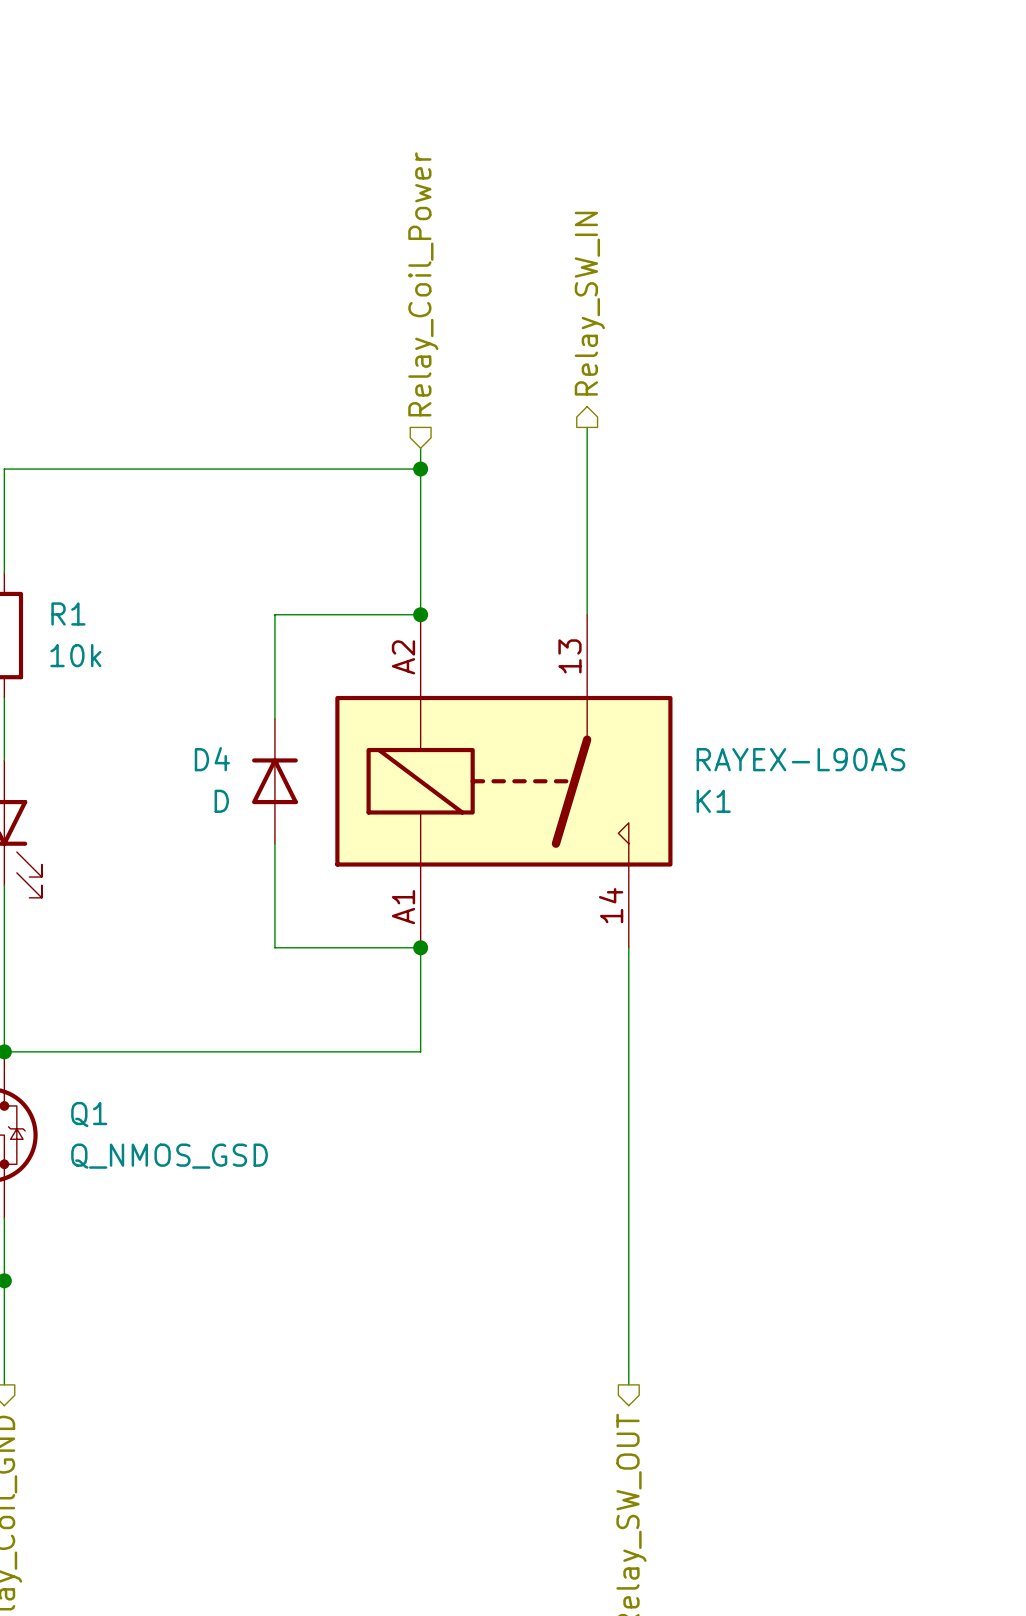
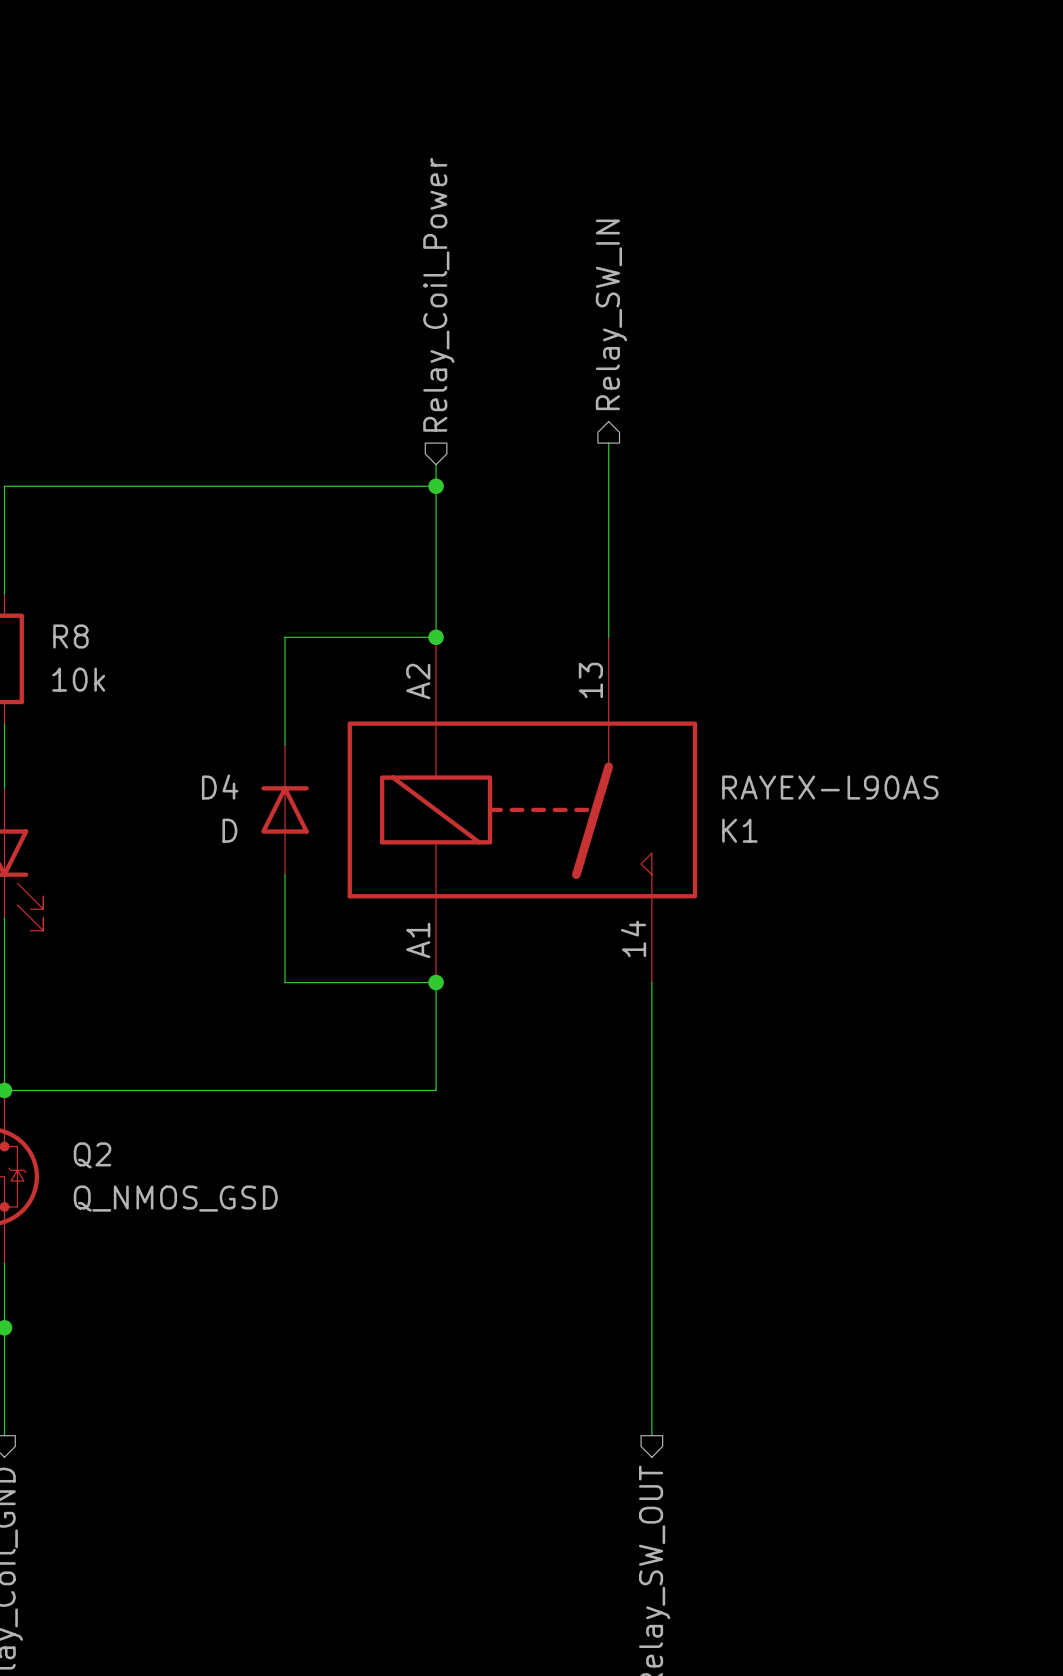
R1 name: R1 (68, 613) -> R8 (70, 636)
Q1 name: Q1 (89, 1114) -> Q2 (92, 1155)

